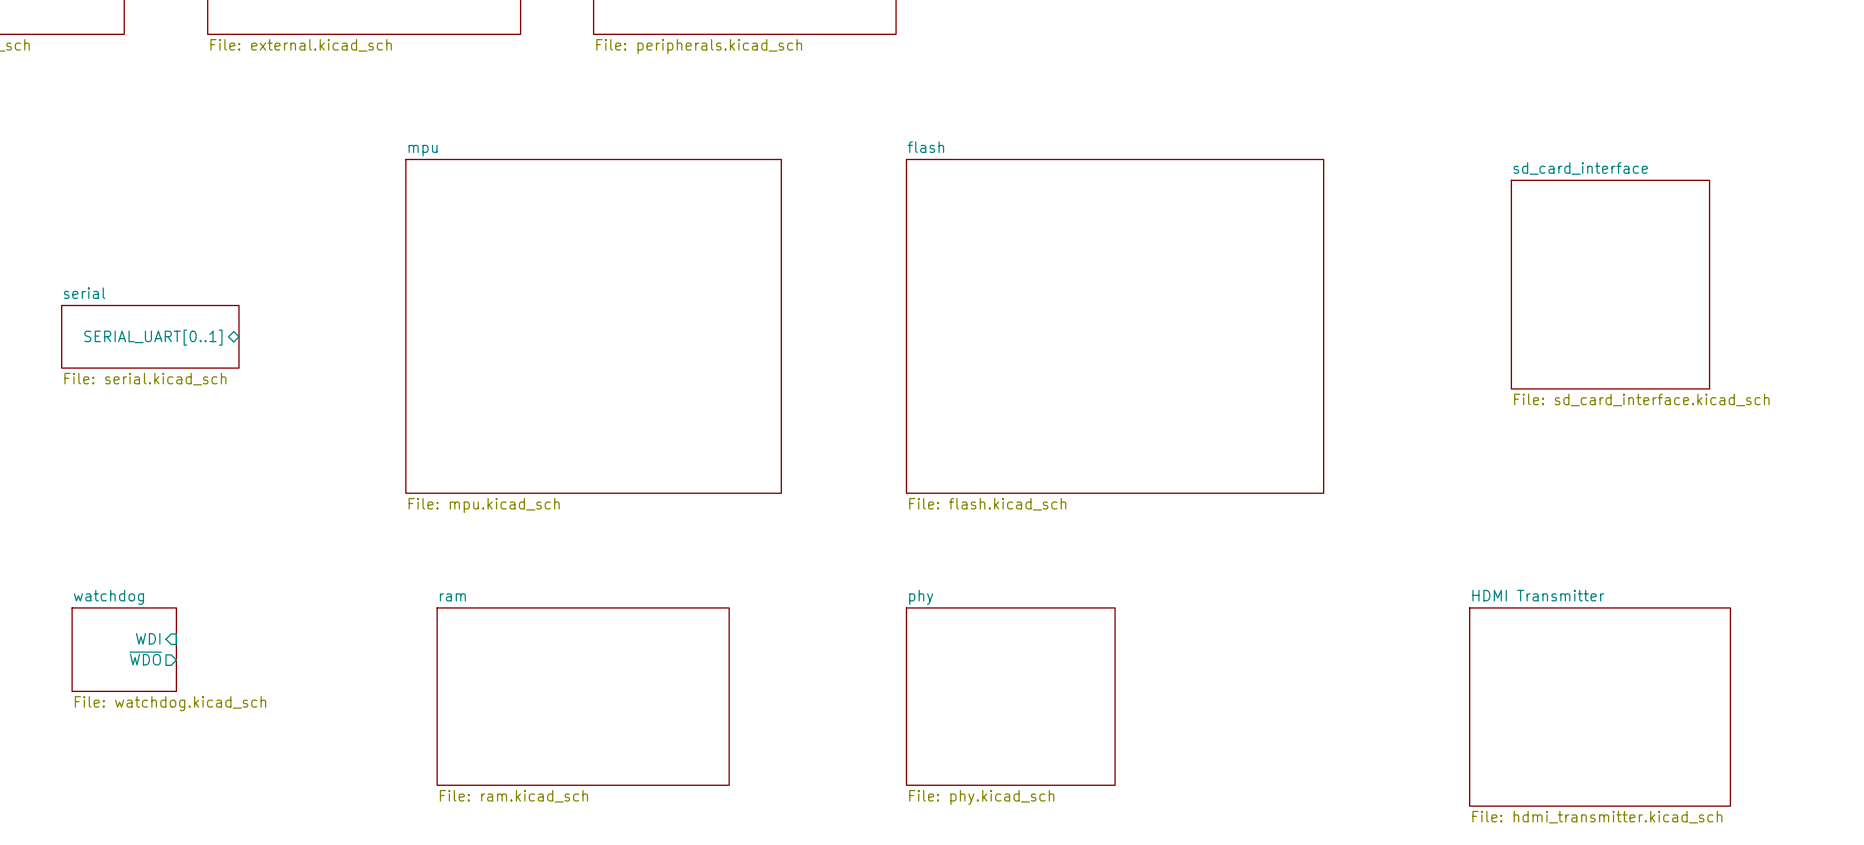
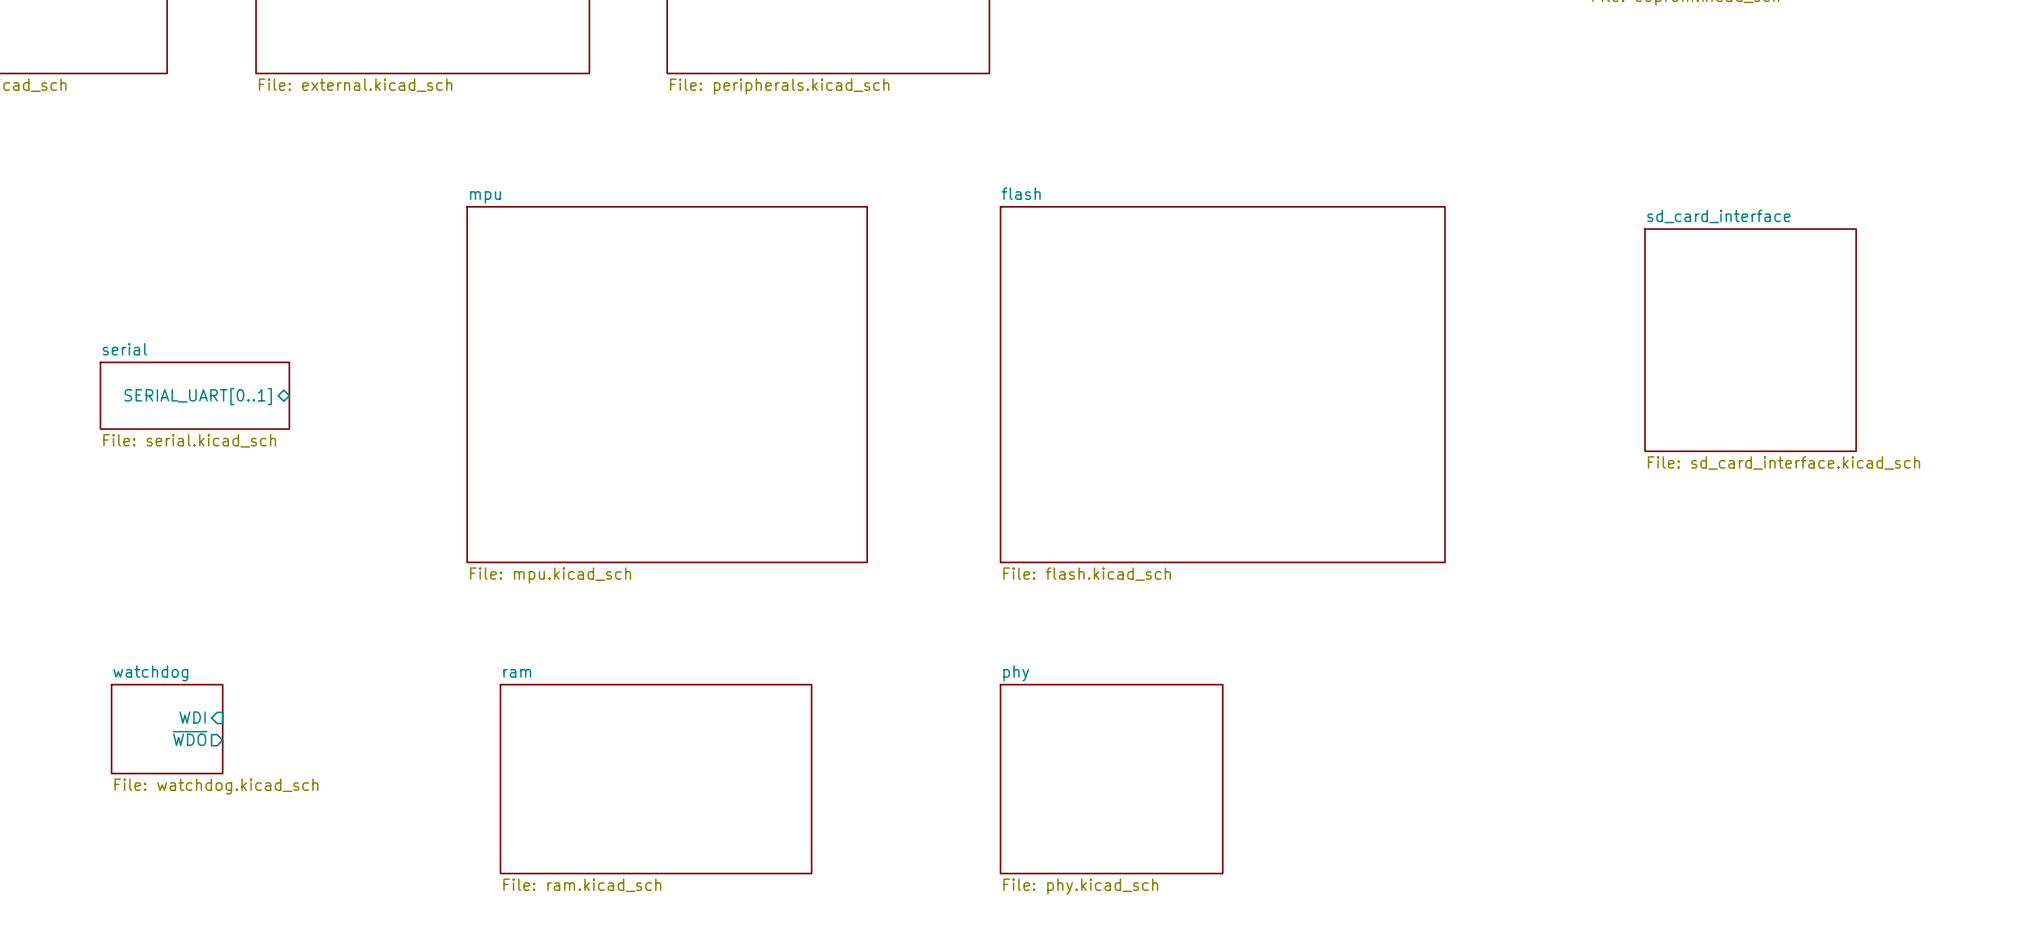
sheet HDMI Transmitter: File: hdmi_transmitter.kicad_sch (1600, 707) -> none

